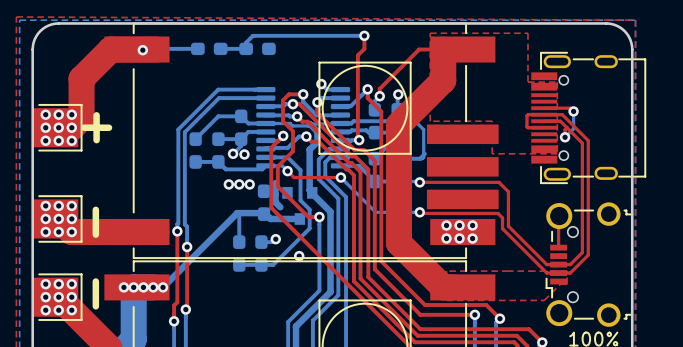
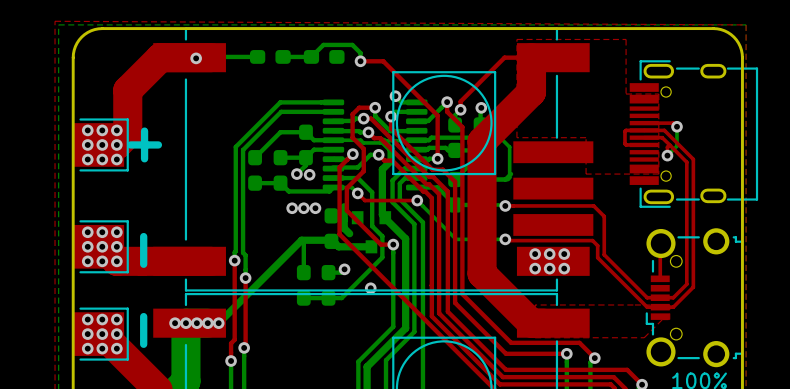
bottom track: (364, 35) (252, 35) (246, 42) (246, 48) -> (360, 61) (360, 53) (352, 44) (323, 44) (311, 56)
top track: (364, 35) (364, 48) (357, 55) (359, 140) -> (360, 61) (383, 61) (437, 115) (437, 158)
via position: (364, 35) -> (360, 61)

